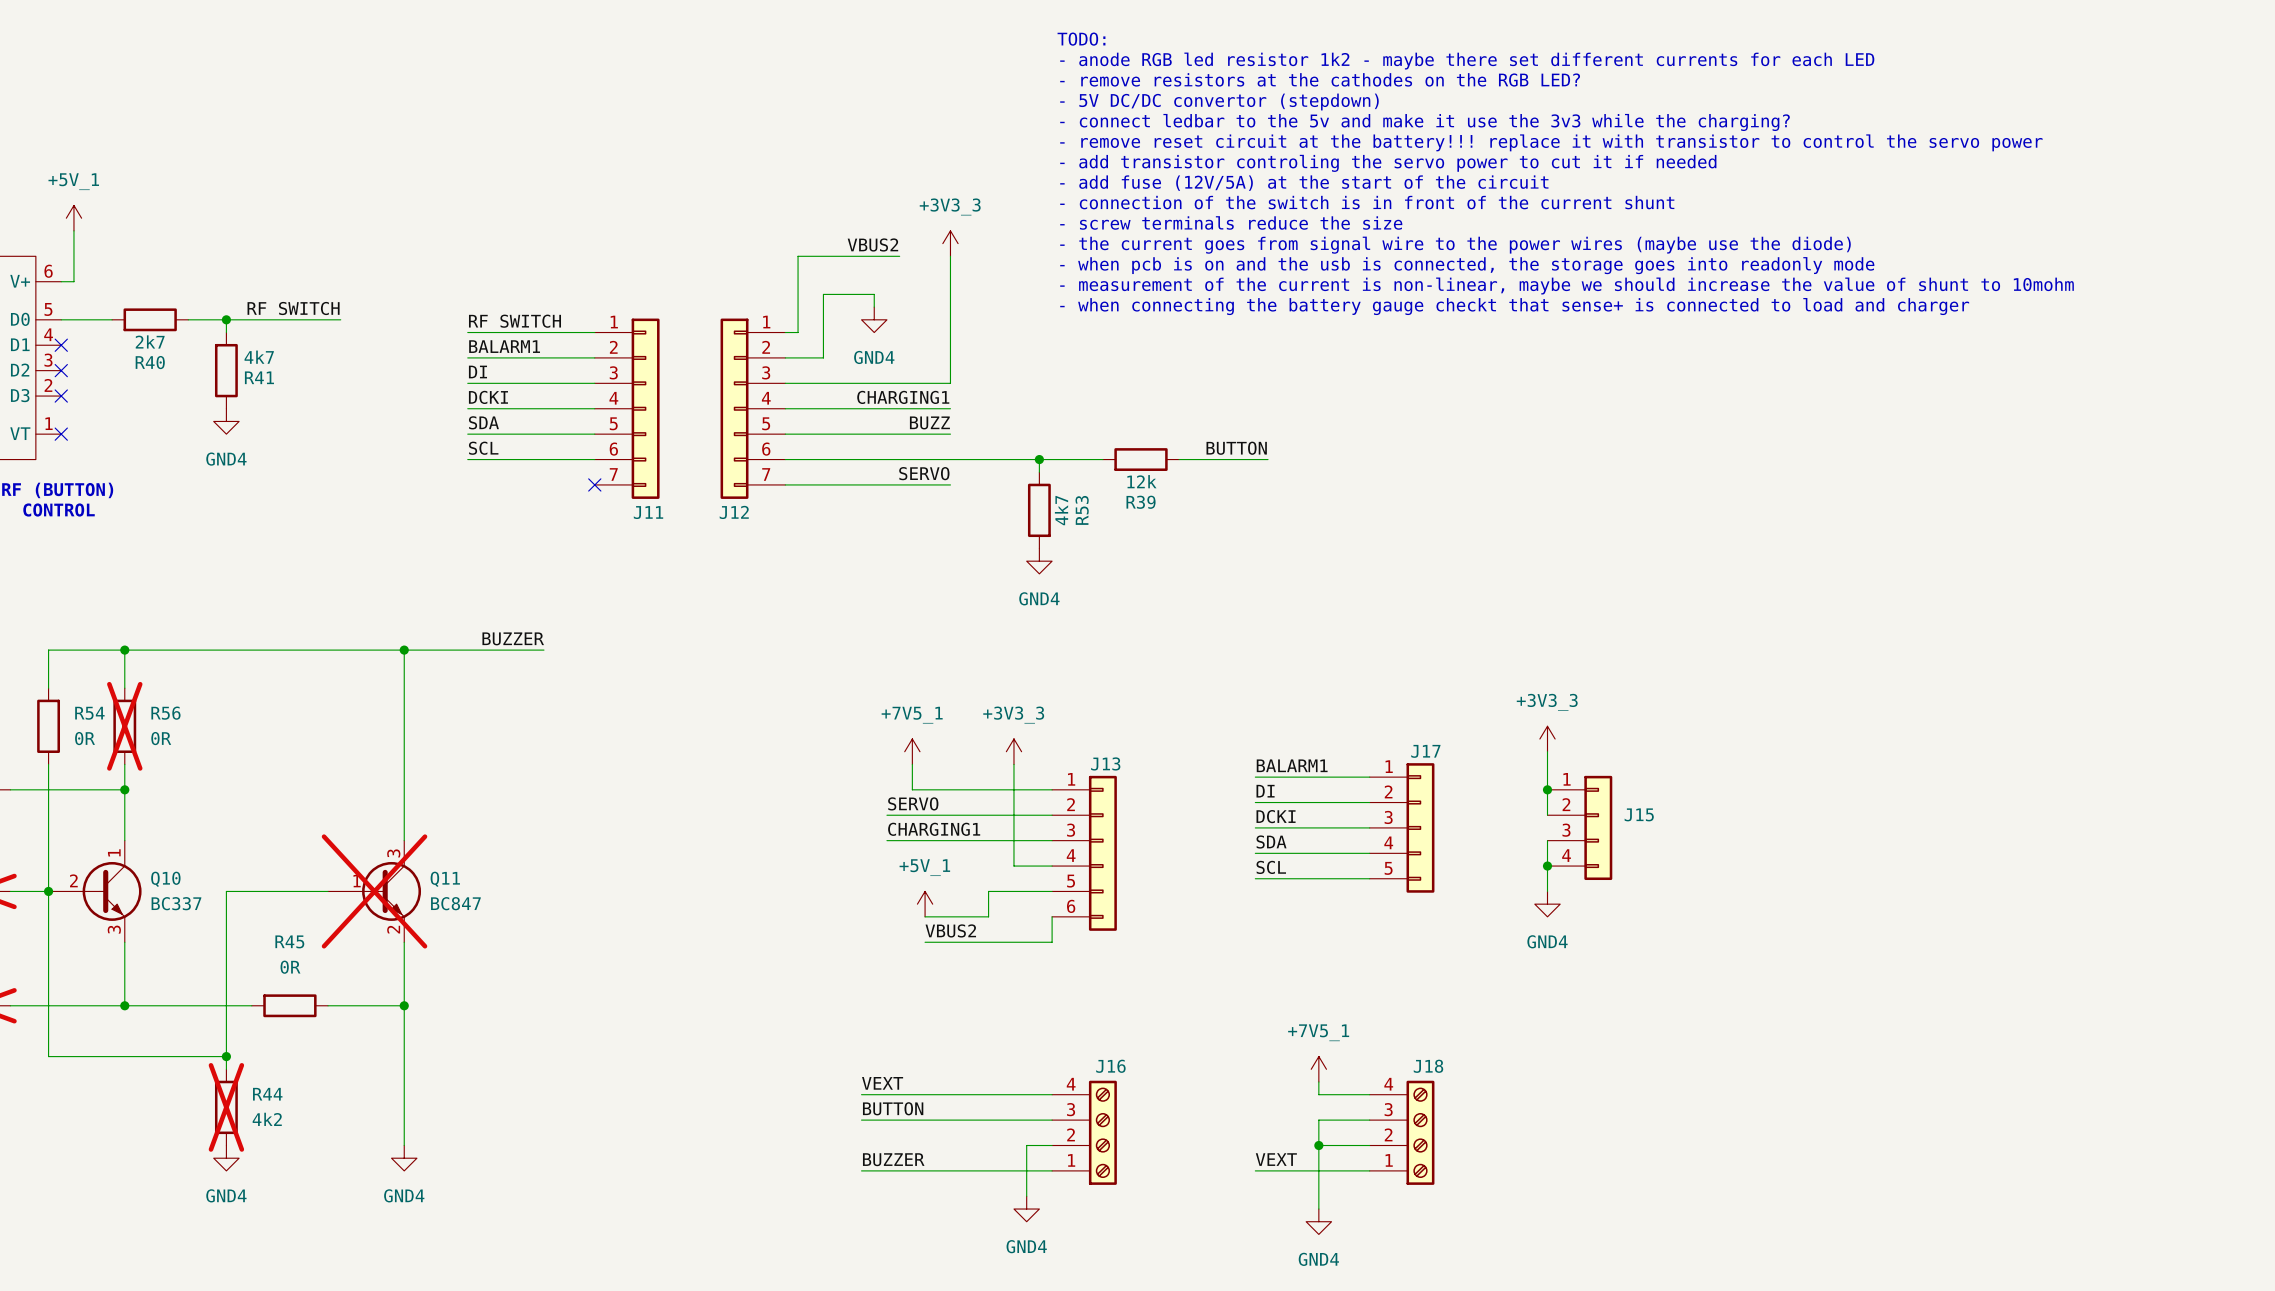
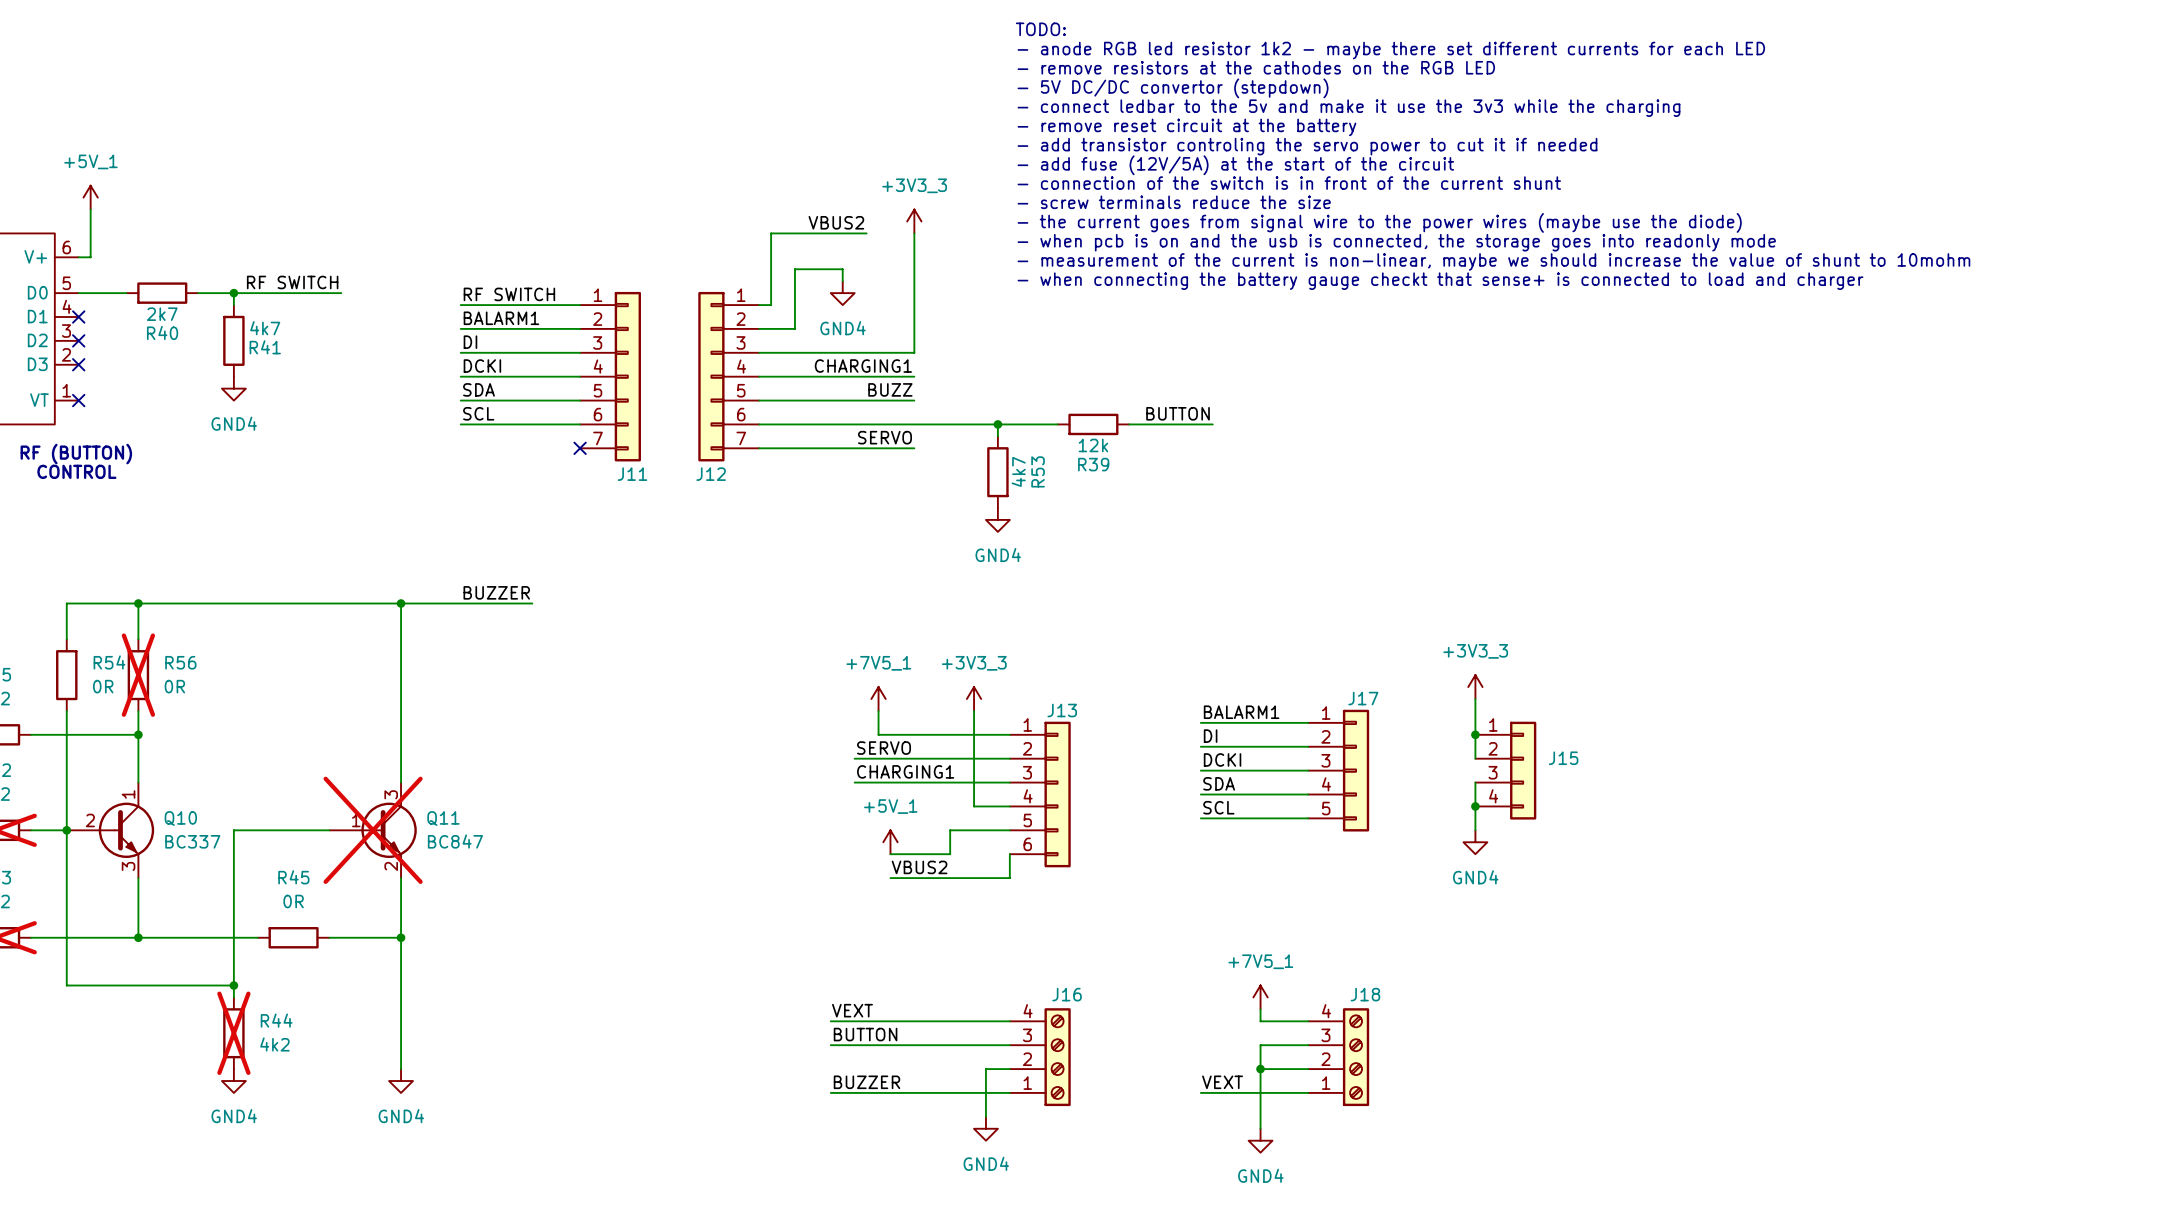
text: - remove resistors at the cathodes on the RGB LED? (1320, 79) -> - remove resistors at the cathodes on the RGB LED (1256, 67)
text: - connect ledbar to the 5v and make it use the 3v3 while the charging? (1425, 122) -> - connect ledbar to the 5v and make it use the 3v3 while the charging (1348, 108)
text: - remove reset circuit at the battery!!! replace it with transistor to control the servo power (1551, 142) -> - remove reset circuit at the battery (1186, 127)

